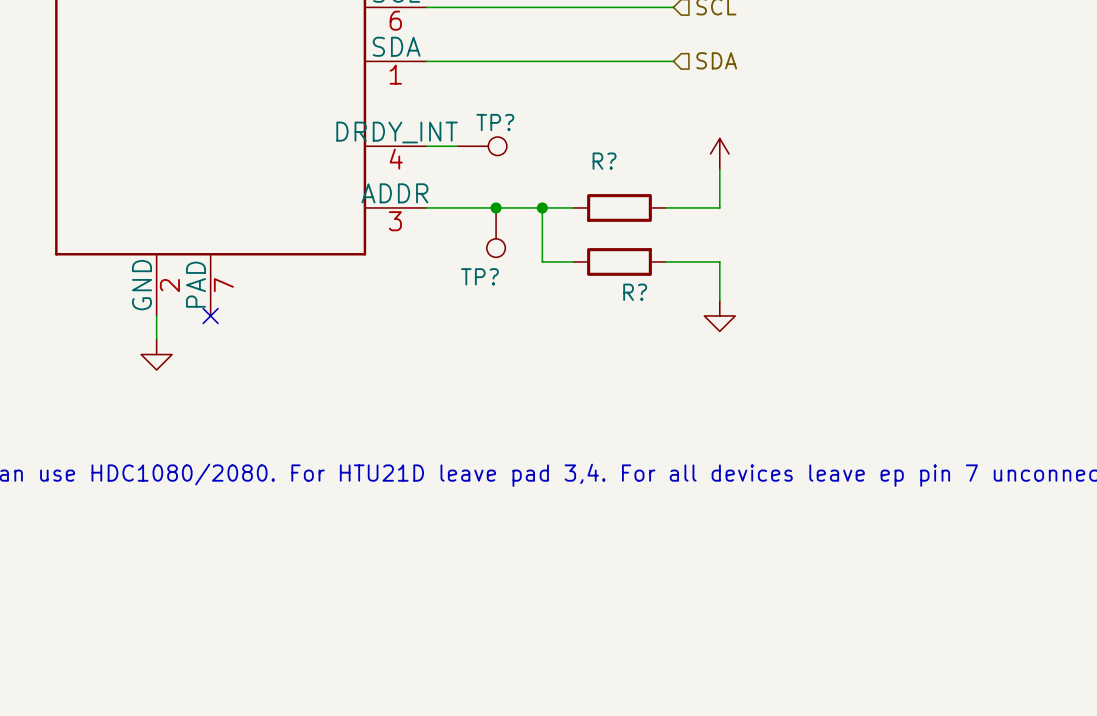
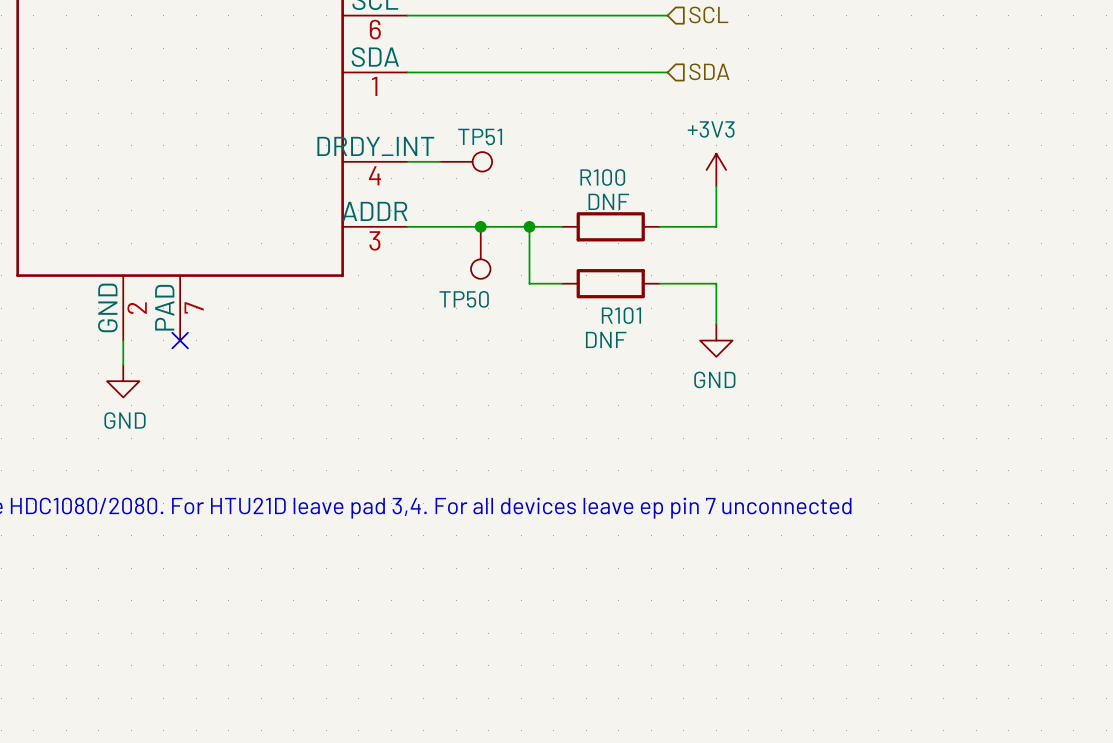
power symbol text: none -> +3V3 (711, 129)
TP? name: TP? (495, 122) -> TP51 (480, 136)
R? name: R? (604, 161) -> R100 (602, 177)
R? value: none -> DNF (608, 201)
TP? name: TP? (479, 276) -> TP50 (464, 299)
R? name: R? (635, 292) -> R101 (621, 315)
R? value: none -> DNF (606, 339)
power symbol text: none -> GND (714, 379)
power symbol text: none -> GND (125, 420)

